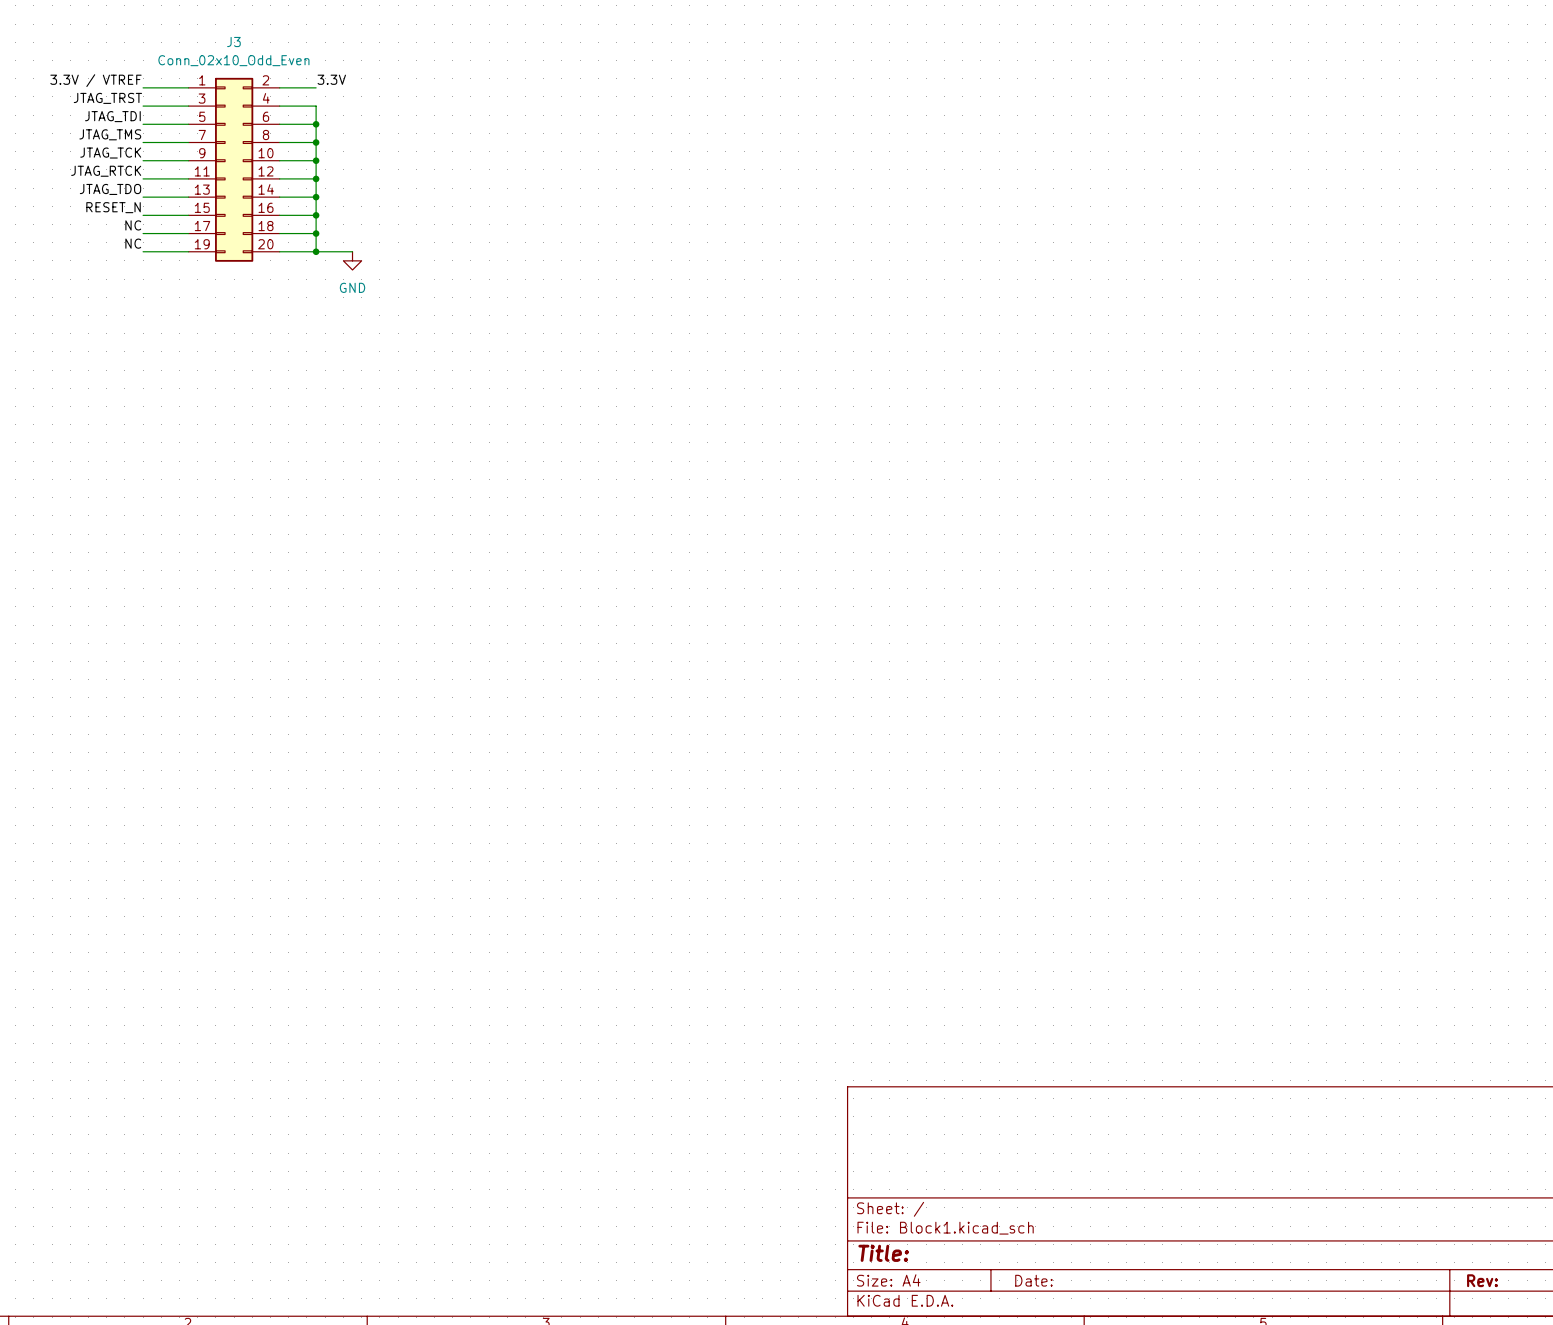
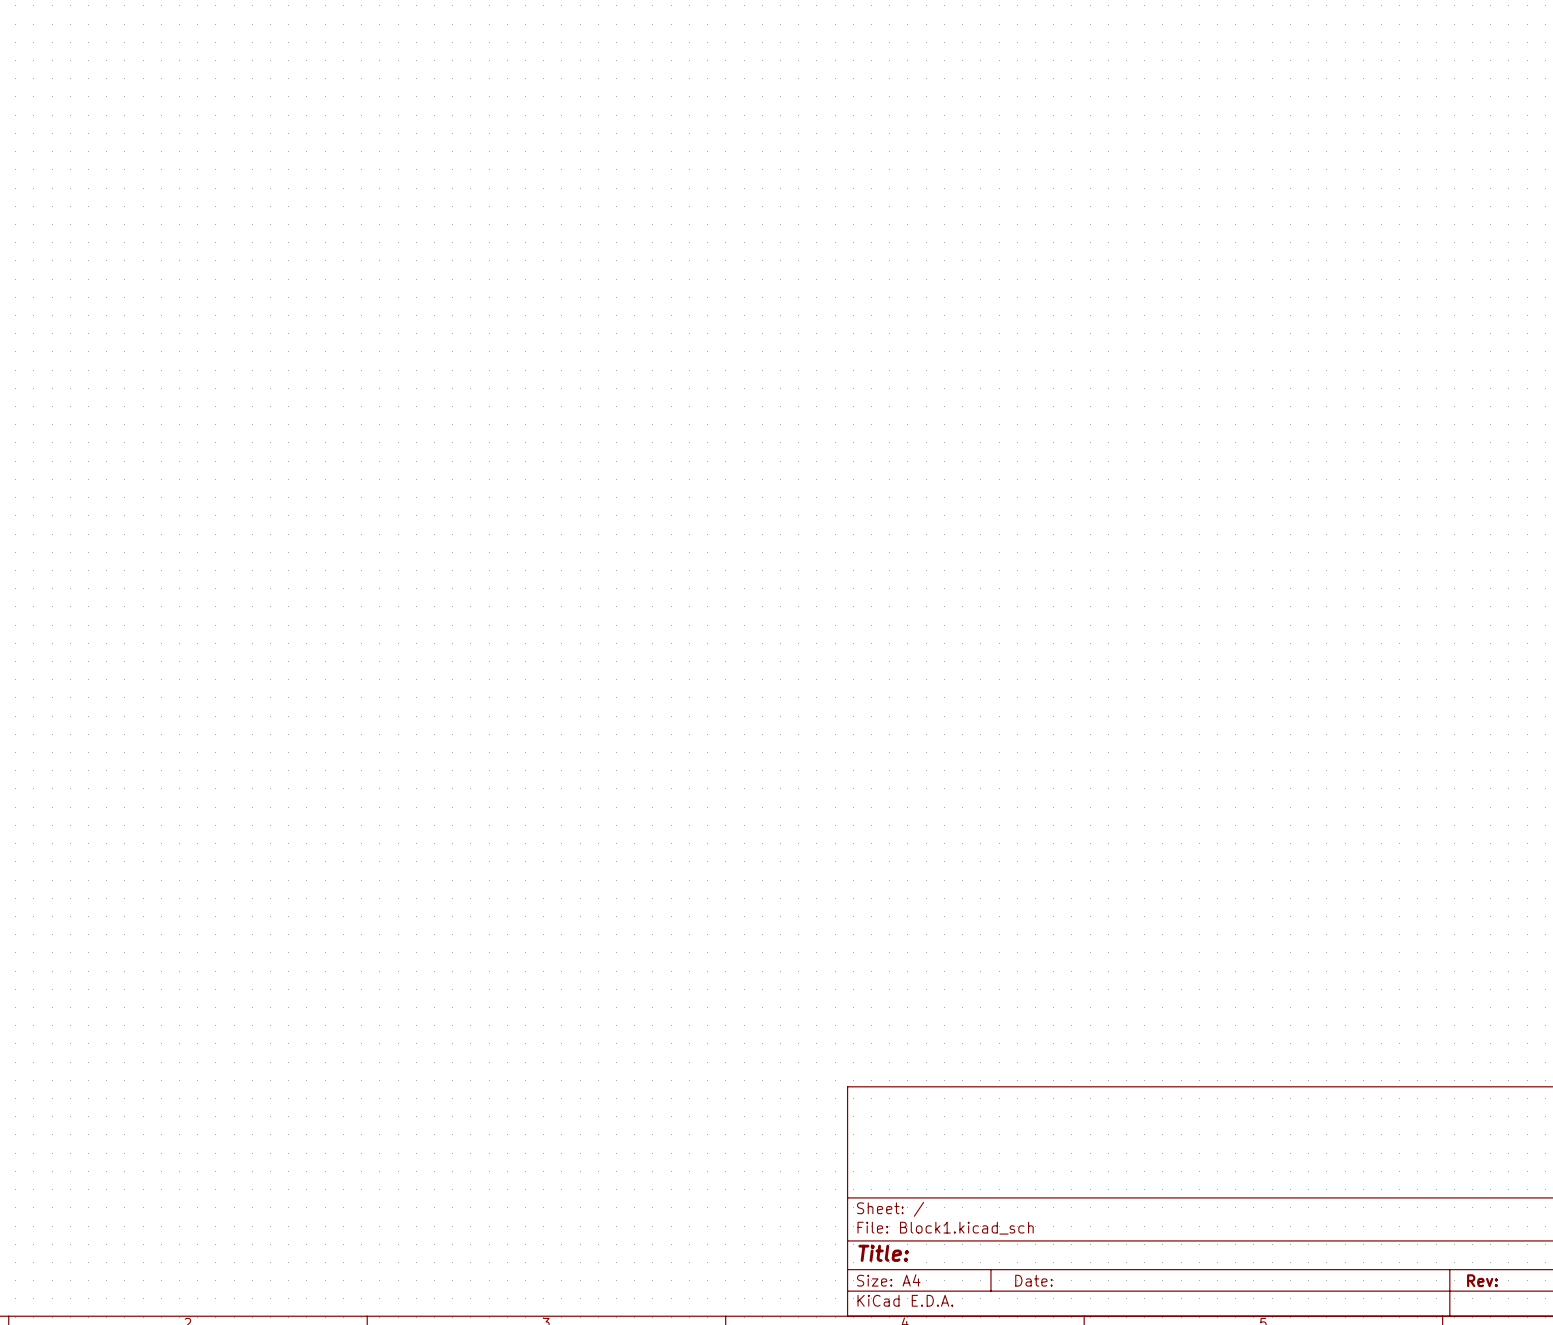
label: 3.3V (331, 79) -> none
label: 3.3V / VTREF (95, 80) -> none
wire: (143, 87) (188, 87) -> none
wire: (279, 87) (316, 87) -> none
label: JTAG_TRST (107, 98) -> none
wire: (143, 106) (188, 106) -> none
wire: (279, 106) (316, 106) (316, 251) -> none
label: JTAG_TDI (112, 116) -> none
wire: (143, 124) (188, 124) -> none
wire: (279, 124) (316, 124) -> none
junction: (316, 124) -> none
label: JTAG_TMS (110, 134) -> none
wire: (143, 142) (188, 142) -> none
wire: (279, 142) (316, 142) -> none
junction: (316, 142) -> none
label: JTAG_TCK (110, 153) -> none
wire: (143, 160) (188, 160) -> none
wire: (279, 160) (316, 160) -> none
junction: (316, 160) -> none
J3: Conn_02x10_Odd_Even (234, 169) -> none
label: JTAG_RTCK (106, 171) -> none
wire: (143, 178) (188, 178) -> none
wire: (279, 178) (316, 178) -> none
junction: (316, 178) -> none
label: JTAG_TDO (110, 189) -> none
wire: (143, 197) (188, 197) -> none
wire: (279, 197) (316, 197) -> none
junction: (316, 197) -> none
label: RESET_N (113, 207) -> none
wire: (143, 215) (188, 215) -> none
wire: (279, 215) (316, 215) -> none
junction: (316, 215) -> none
label: NC (133, 225) -> none
wire: (143, 233) (188, 233) -> none
wire: (279, 233) (316, 233) -> none
junction: (316, 233) -> none
label: NC (133, 243) -> none
wire: (143, 251) (188, 251) -> none
wire: (279, 251) (352, 251) -> none
junction: (316, 251) -> none
power symbol: GND (352, 260) -> none

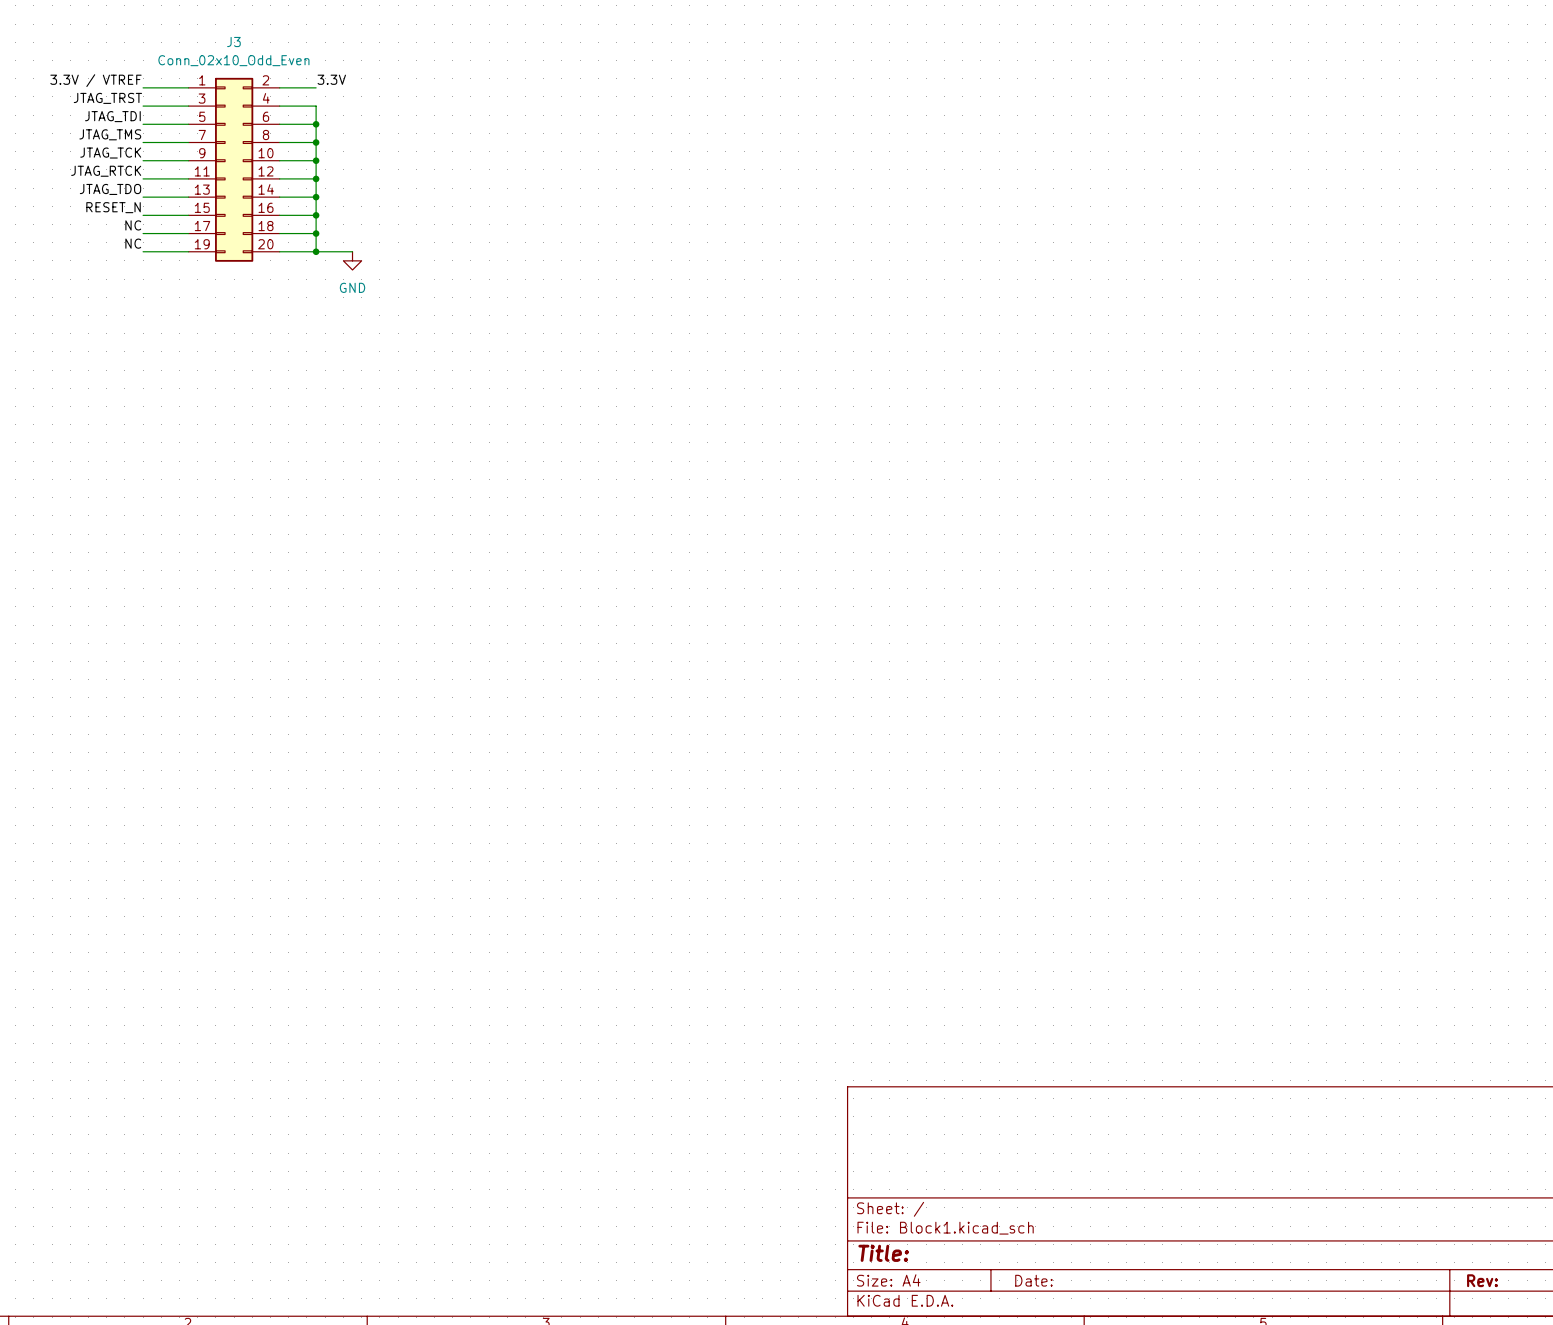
label: none -> 3.3V (331, 79)
label: none -> 3.3V / VTREF (95, 80)
wire: none -> (143, 87) (188, 87)
wire: none -> (279, 87) (316, 87)
label: none -> JTAG_TRST (107, 98)
wire: none -> (143, 106) (188, 106)
wire: none -> (279, 106) (316, 106) (316, 251)
label: none -> JTAG_TDI (112, 116)
wire: none -> (143, 124) (188, 124)
wire: none -> (279, 124) (316, 124)
junction: none -> (316, 124)
label: none -> JTAG_TMS (110, 134)
wire: none -> (143, 142) (188, 142)
wire: none -> (279, 142) (316, 142)
junction: none -> (316, 142)
label: none -> JTAG_TCK (110, 153)
wire: none -> (143, 160) (188, 160)
wire: none -> (279, 160) (316, 160)
junction: none -> (316, 160)
J3: none -> Conn_02x10_Odd_Even (234, 169)
label: none -> JTAG_RTCK (106, 171)
wire: none -> (143, 178) (188, 178)
wire: none -> (279, 178) (316, 178)
junction: none -> (316, 178)
label: none -> JTAG_TDO (110, 189)
wire: none -> (143, 197) (188, 197)
wire: none -> (279, 197) (316, 197)
junction: none -> (316, 197)
label: none -> RESET_N (113, 207)
wire: none -> (143, 215) (188, 215)
wire: none -> (279, 215) (316, 215)
junction: none -> (316, 215)
label: none -> NC (133, 225)
wire: none -> (143, 233) (188, 233)
wire: none -> (279, 233) (316, 233)
junction: none -> (316, 233)
label: none -> NC (133, 243)
wire: none -> (143, 251) (188, 251)
wire: none -> (279, 251) (352, 251)
junction: none -> (316, 251)
power symbol: none -> GND (352, 260)

